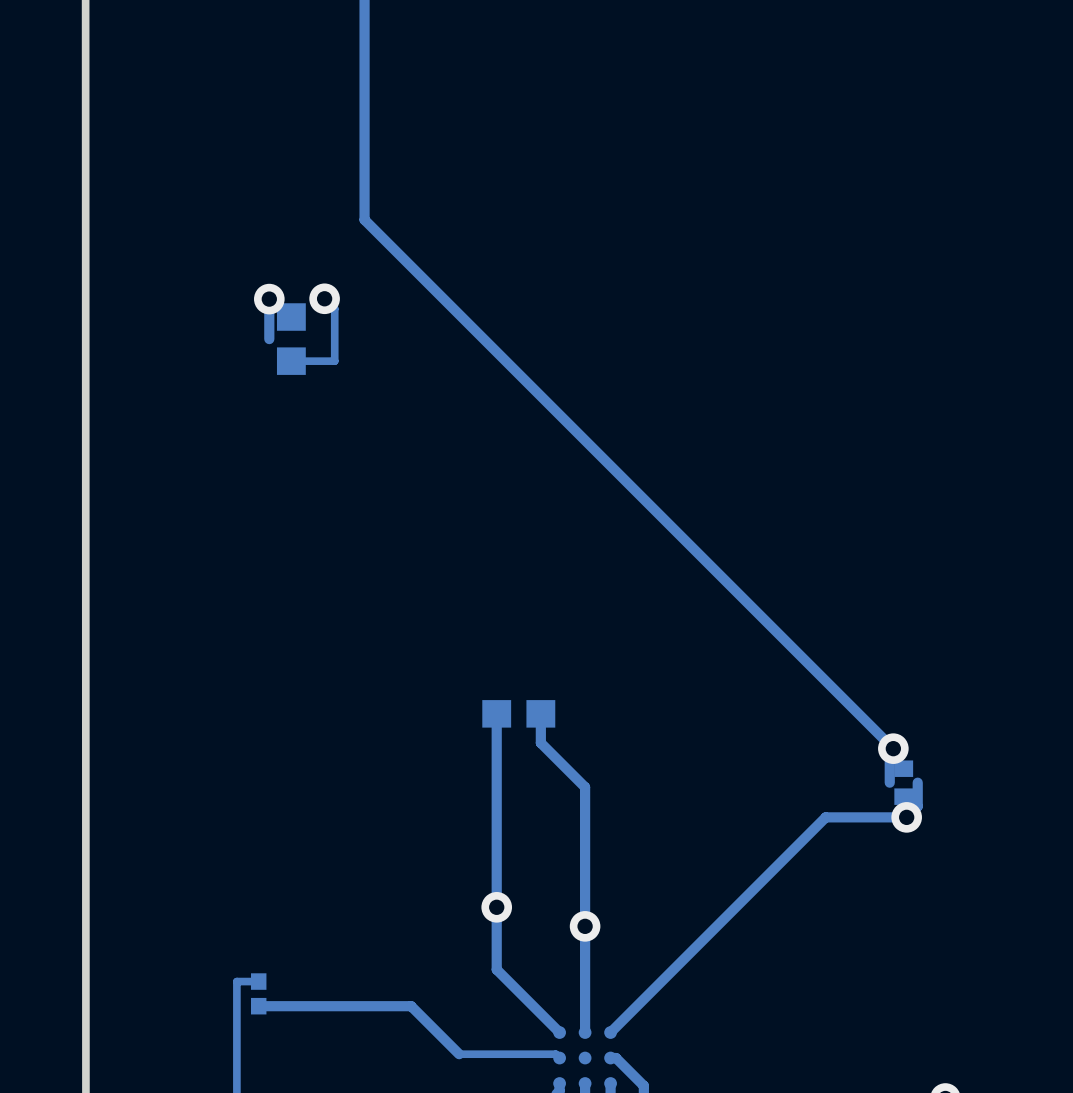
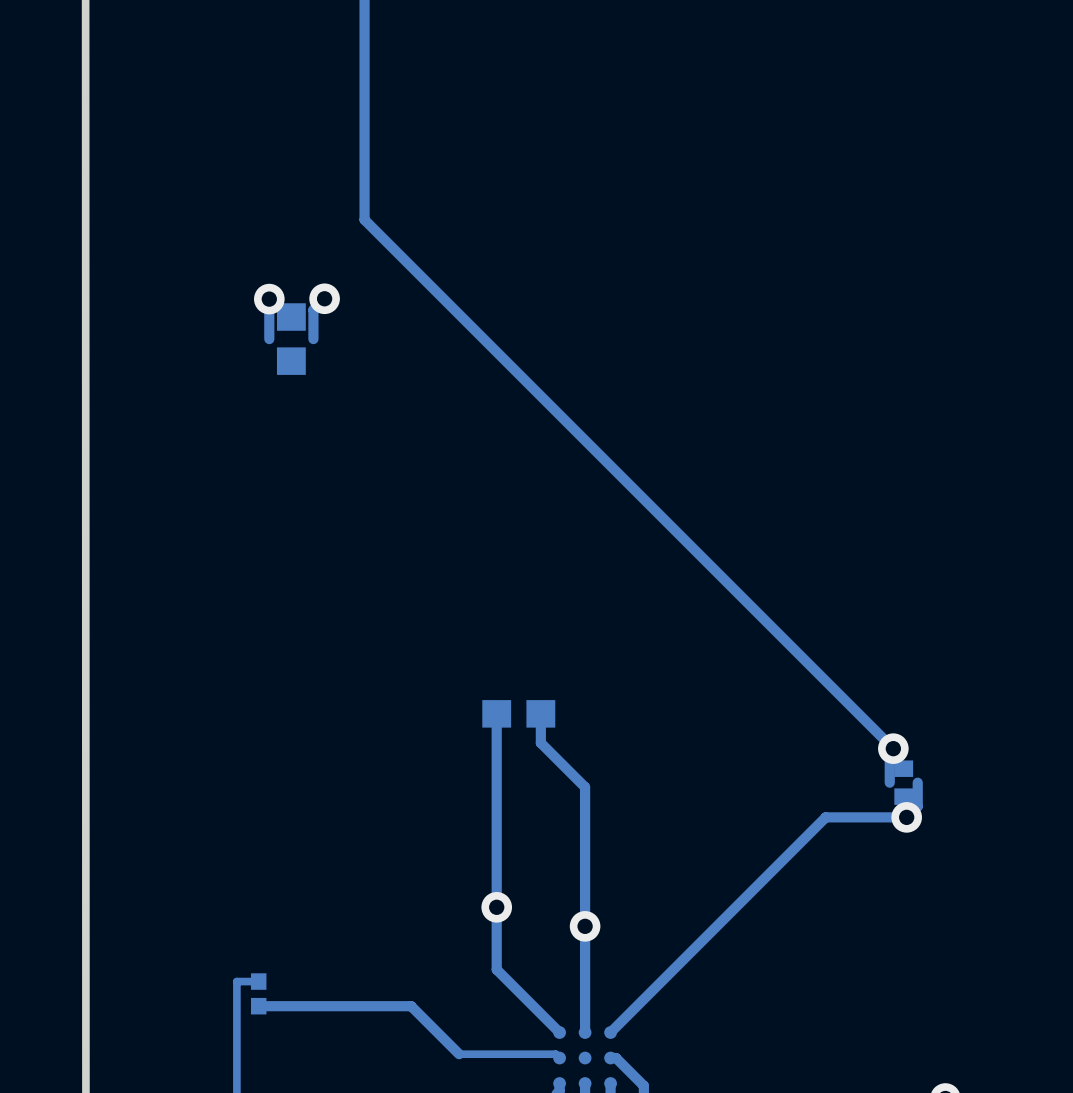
bottom track: (324, 298) (334, 308) (334, 361) (291, 361) -> (324, 298) (313, 309) (313, 339)

